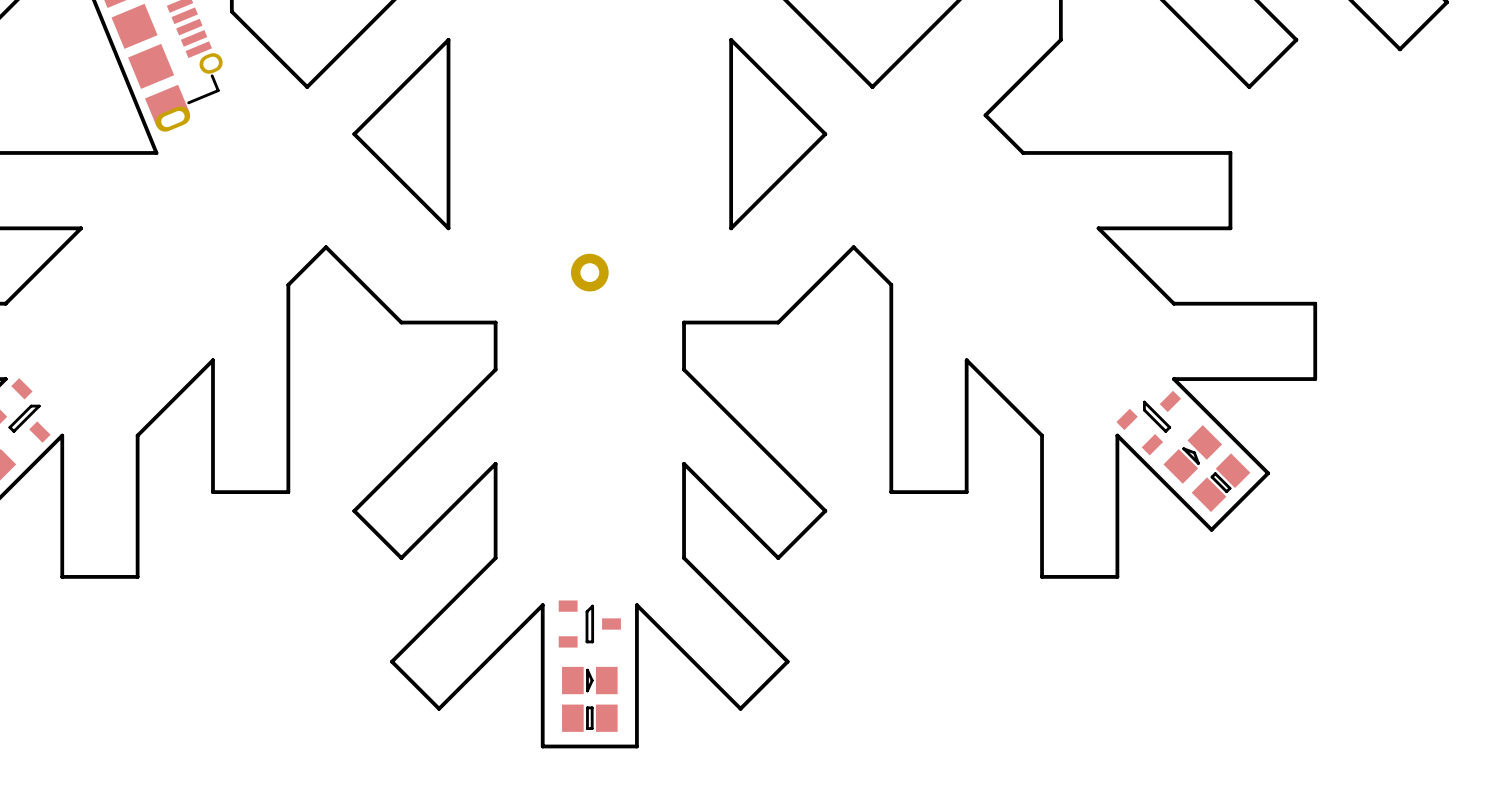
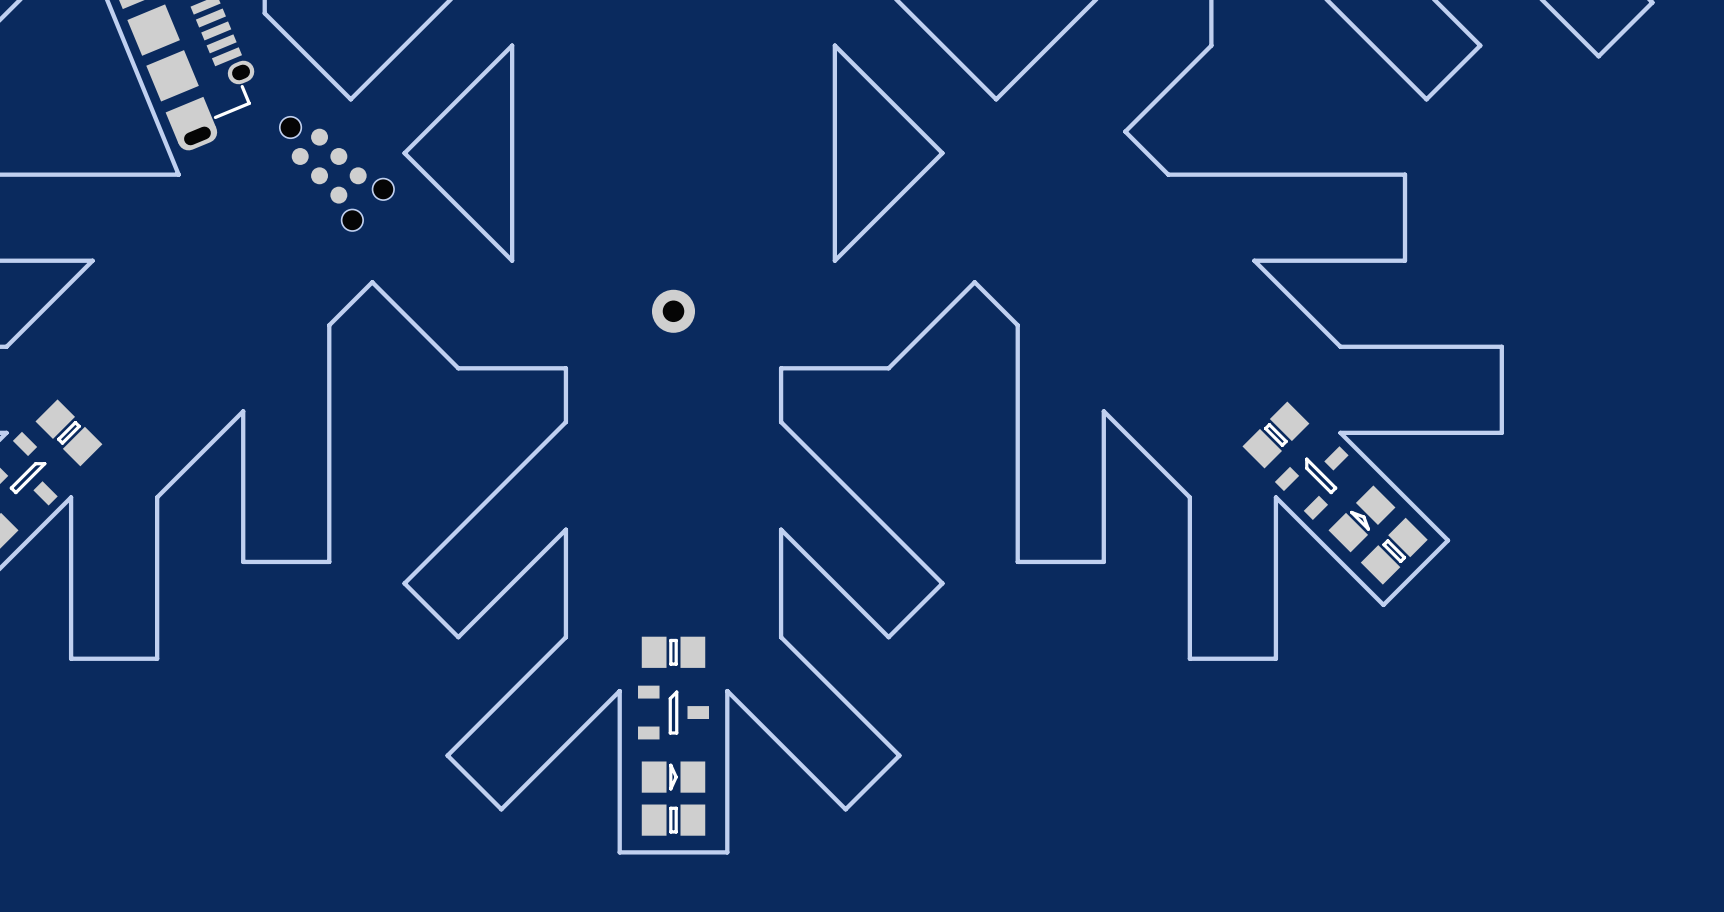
part: none -> (336, 173)
part: none -> (68, 432)
part: none -> (1275, 435)
part: none -> (673, 652)

